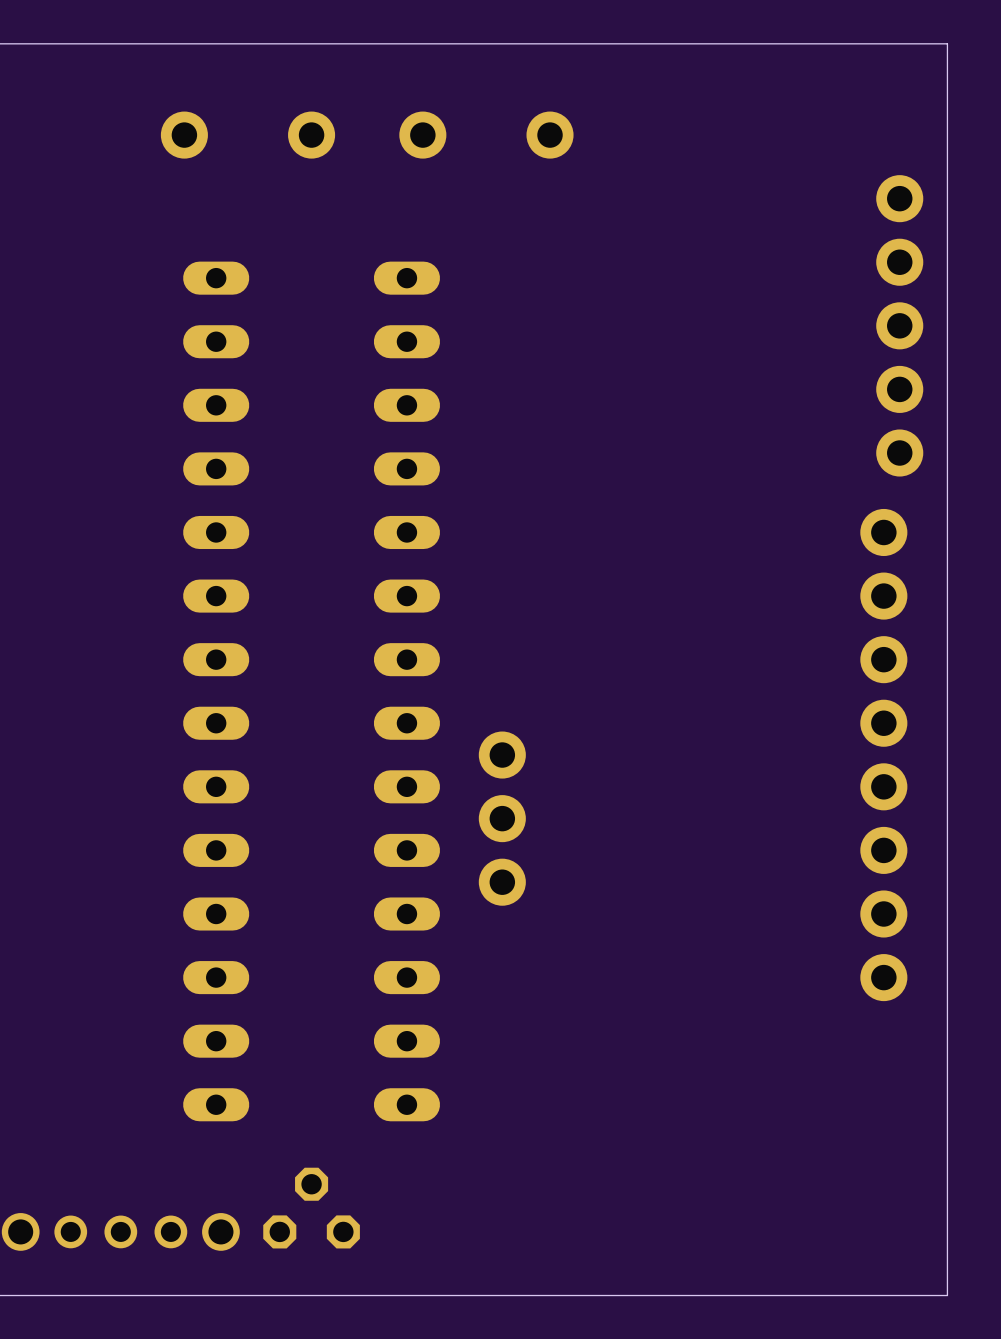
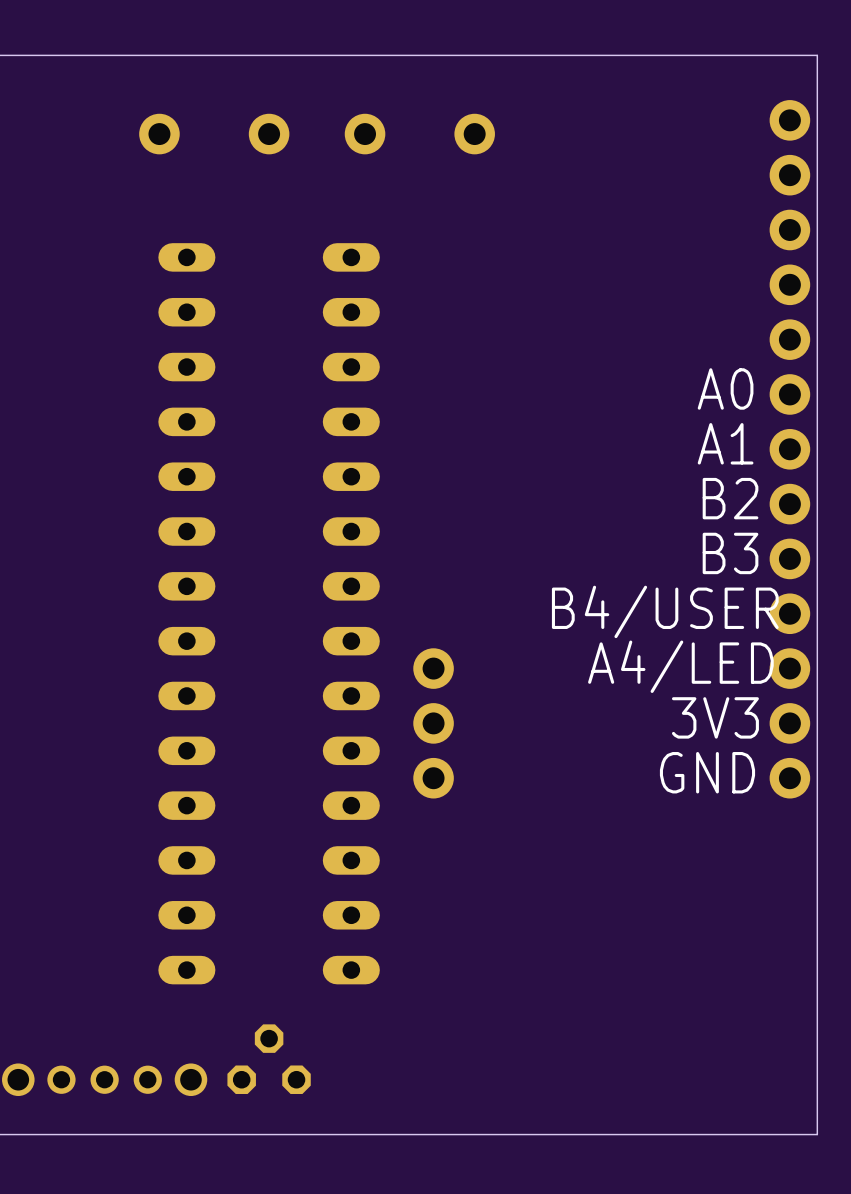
part position: (899, 325) -> (789, 229)
text: none -> A0 (725, 388)
text: none -> A1 (725, 443)
text: none -> B2 (730, 498)
text: none -> B3 (730, 553)
text: none -> B4/USER (665, 611)
text: none -> A4/LED (680, 666)
part position: (883, 755) -> (789, 586)
text: none -> 3V3 (715, 717)
text: none -> GND (707, 772)

